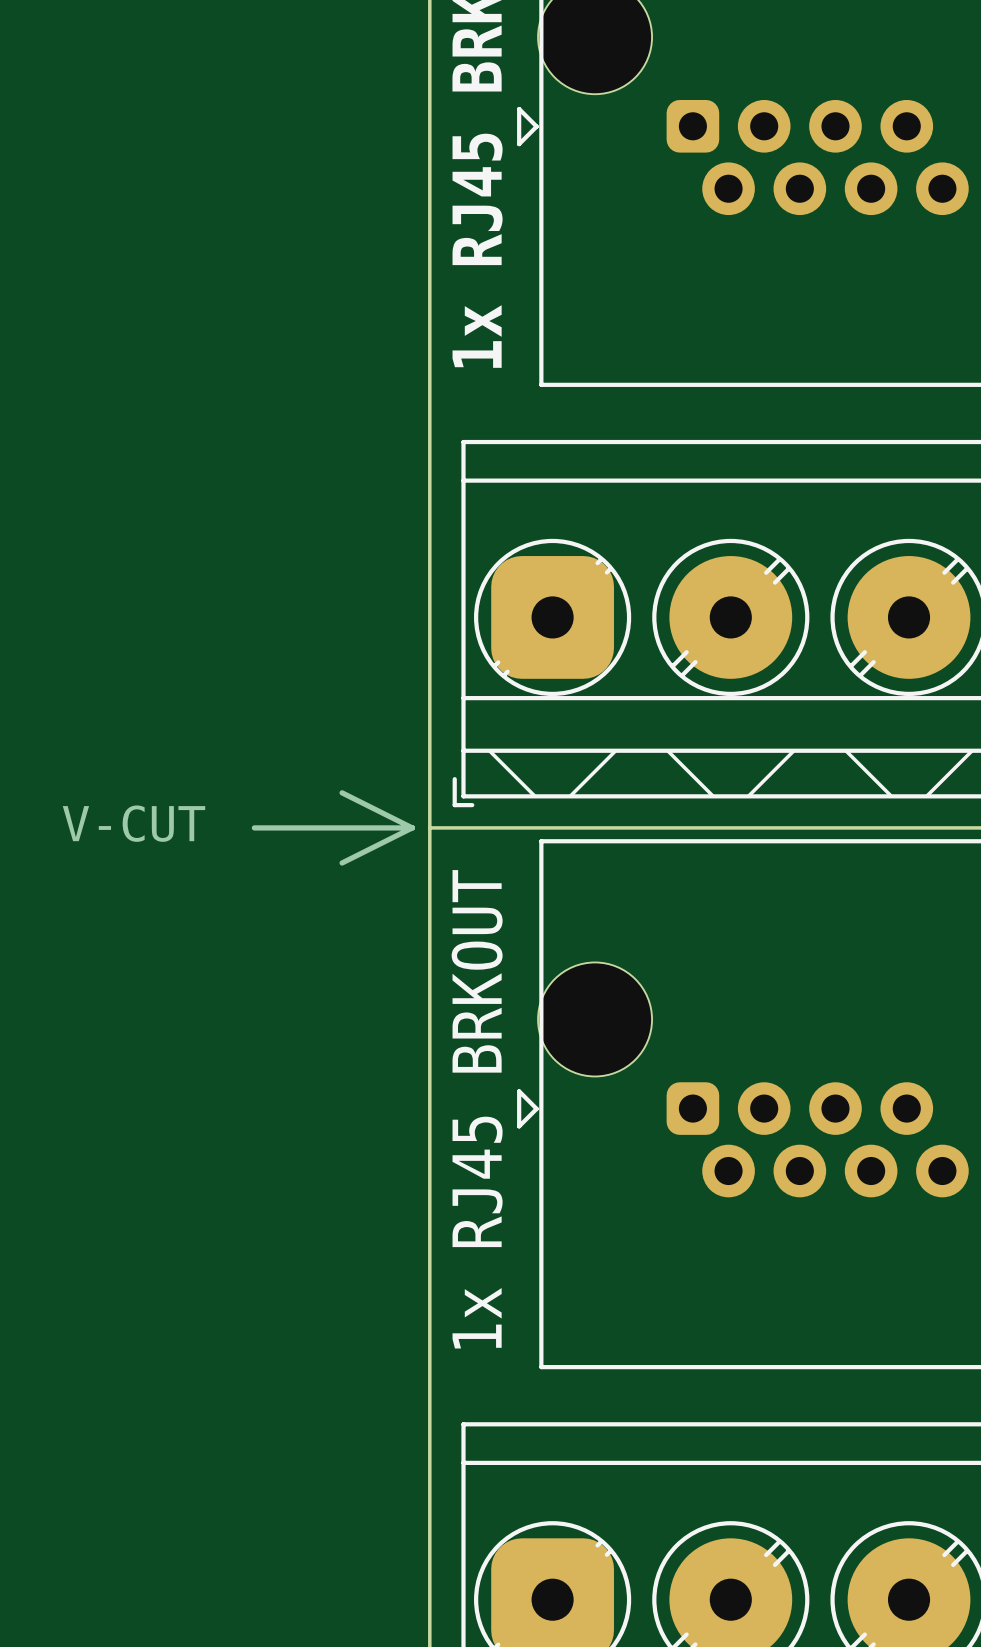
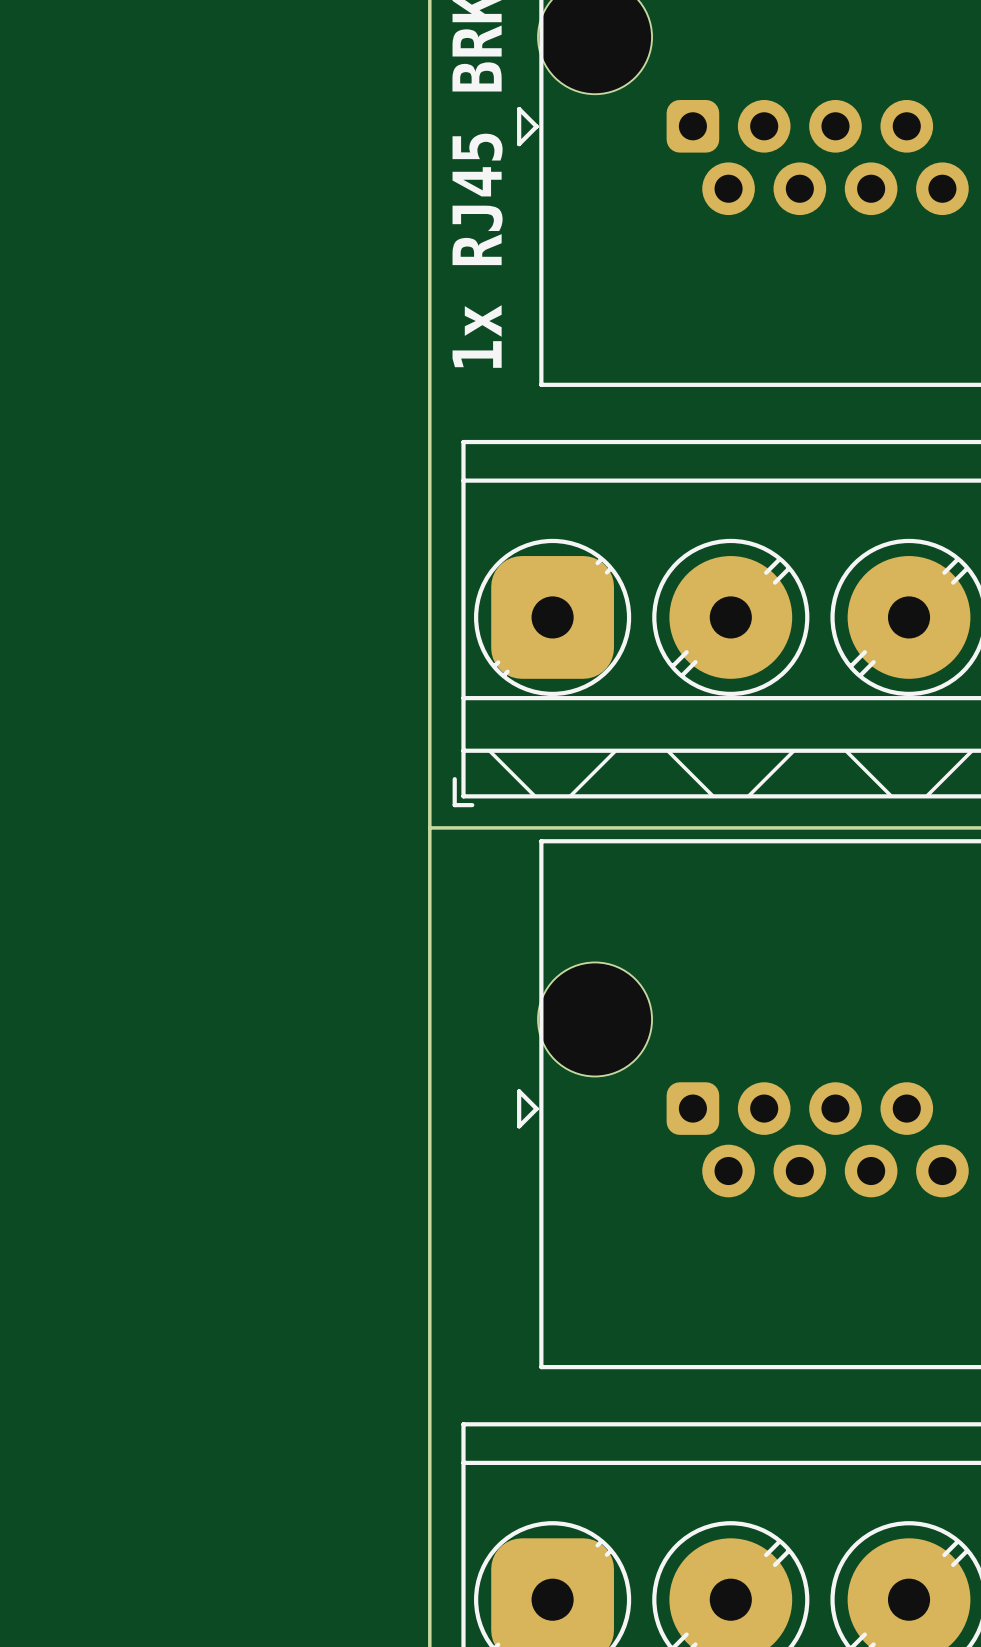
line: (342, 792) (412, 827) -> none
text: V-CUT (133, 823) -> none
line: (254, 827) (412, 827) -> none
line: (412, 827) (342, 863) -> none
text: 1x RJ45 BRKOUT (477, 1109) -> none

